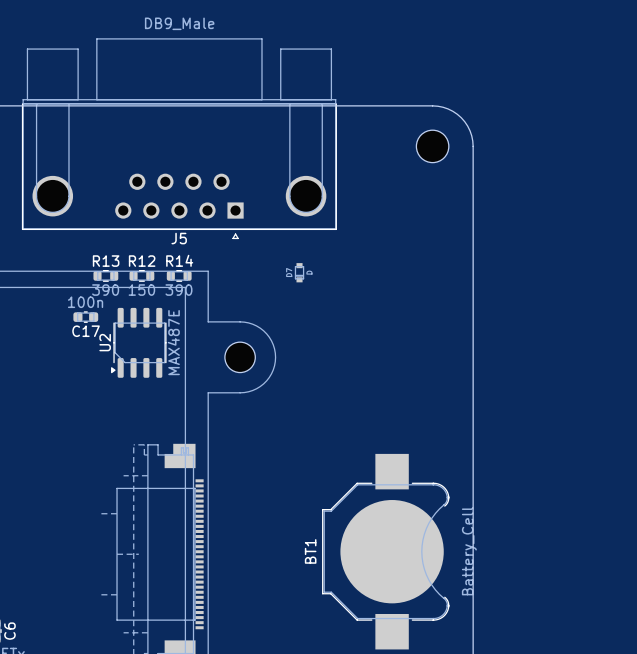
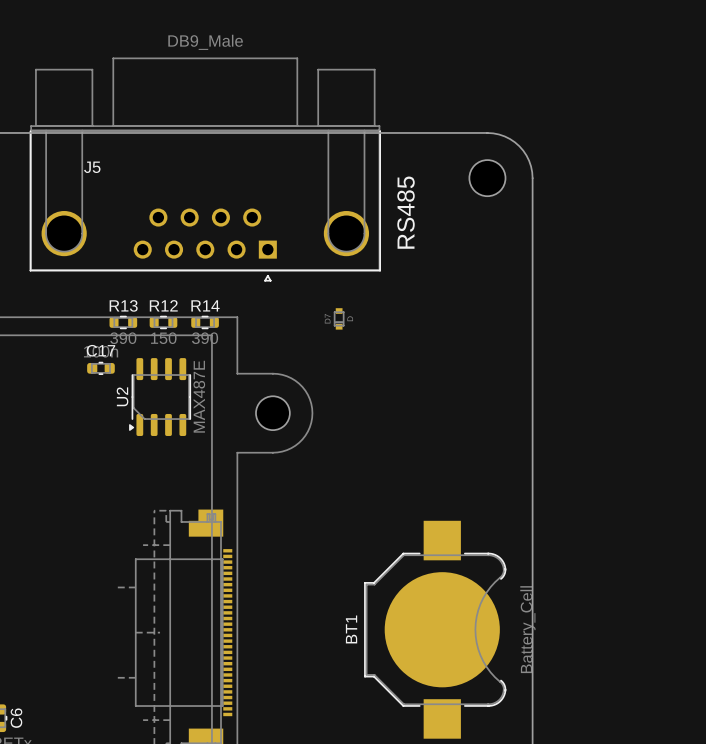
text: none -> RS485 (406, 212)
J5 name position: J5 (179, 238) -> J5 (92, 167)
C17 name position: C17 (86, 331) -> C17 (100, 350)

